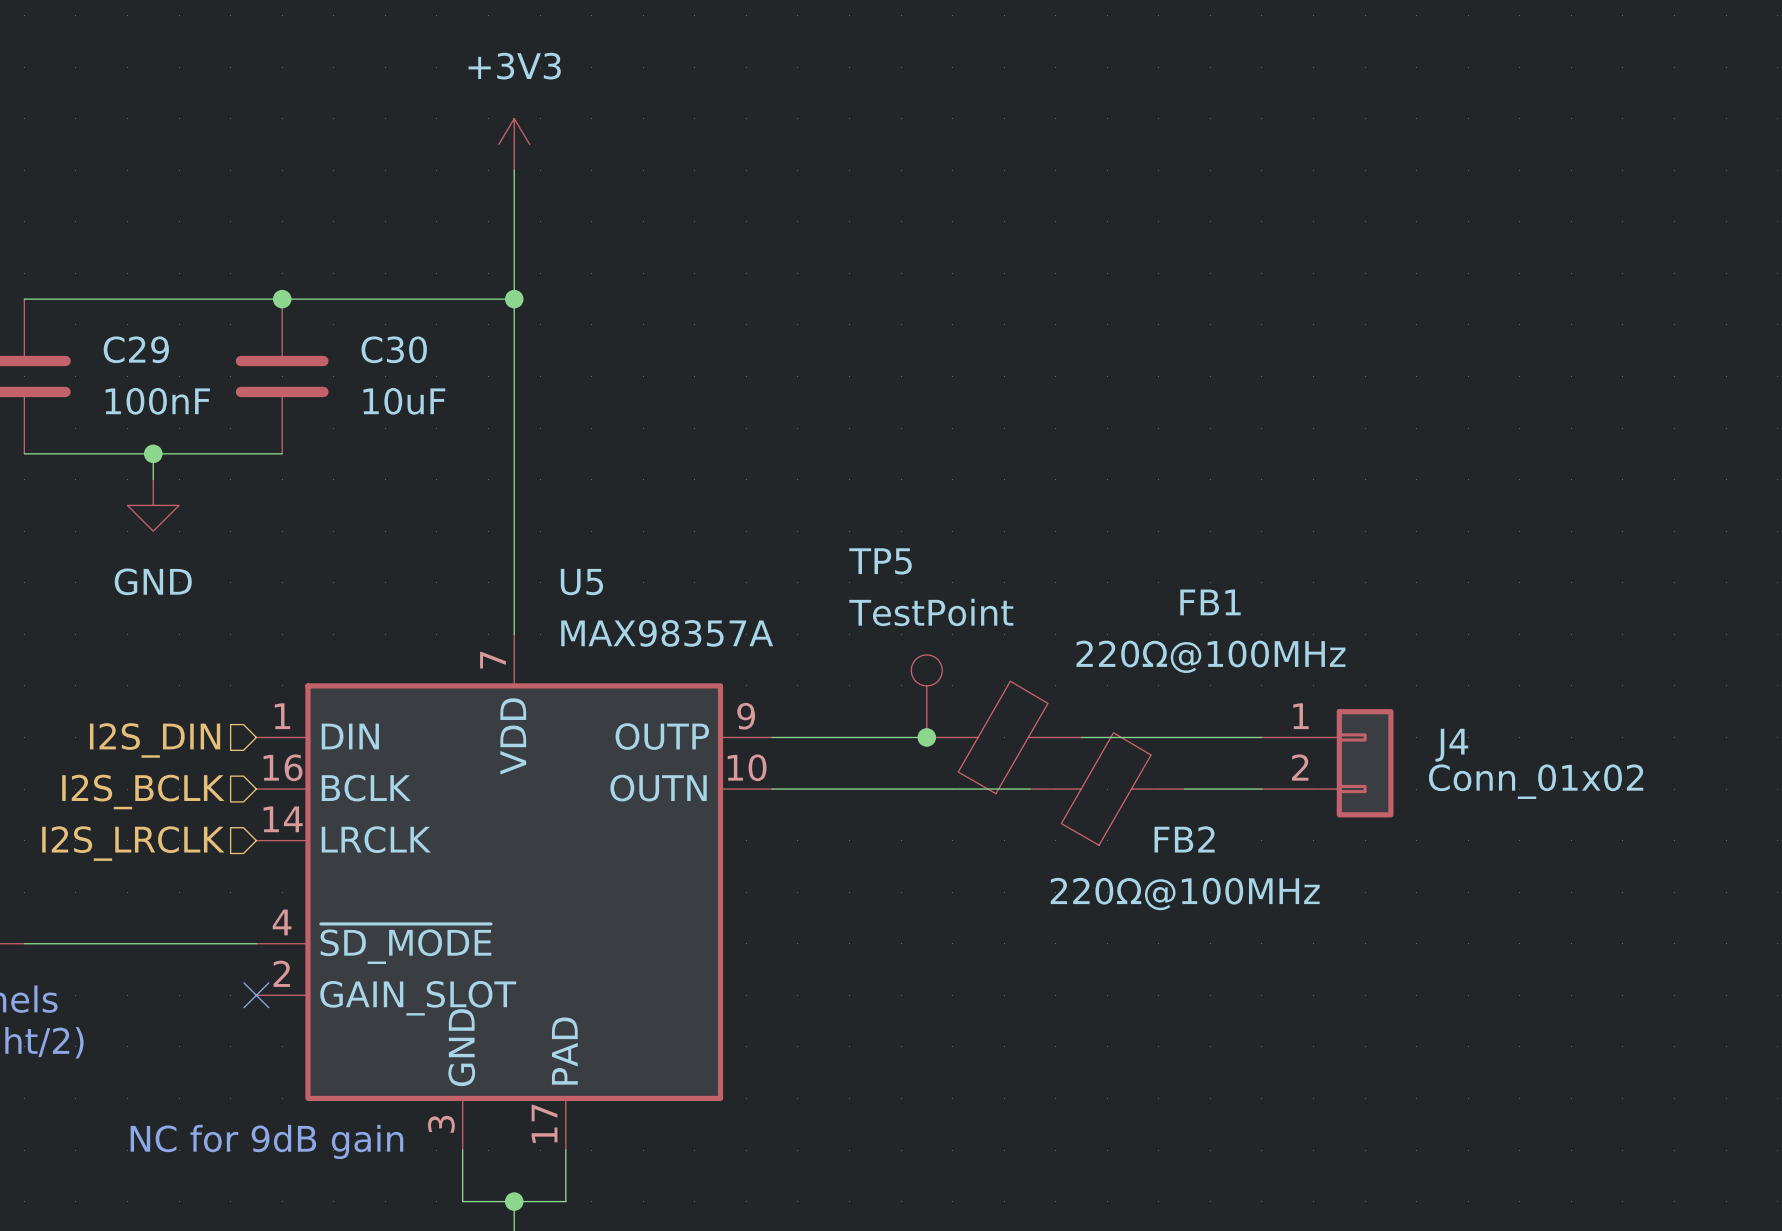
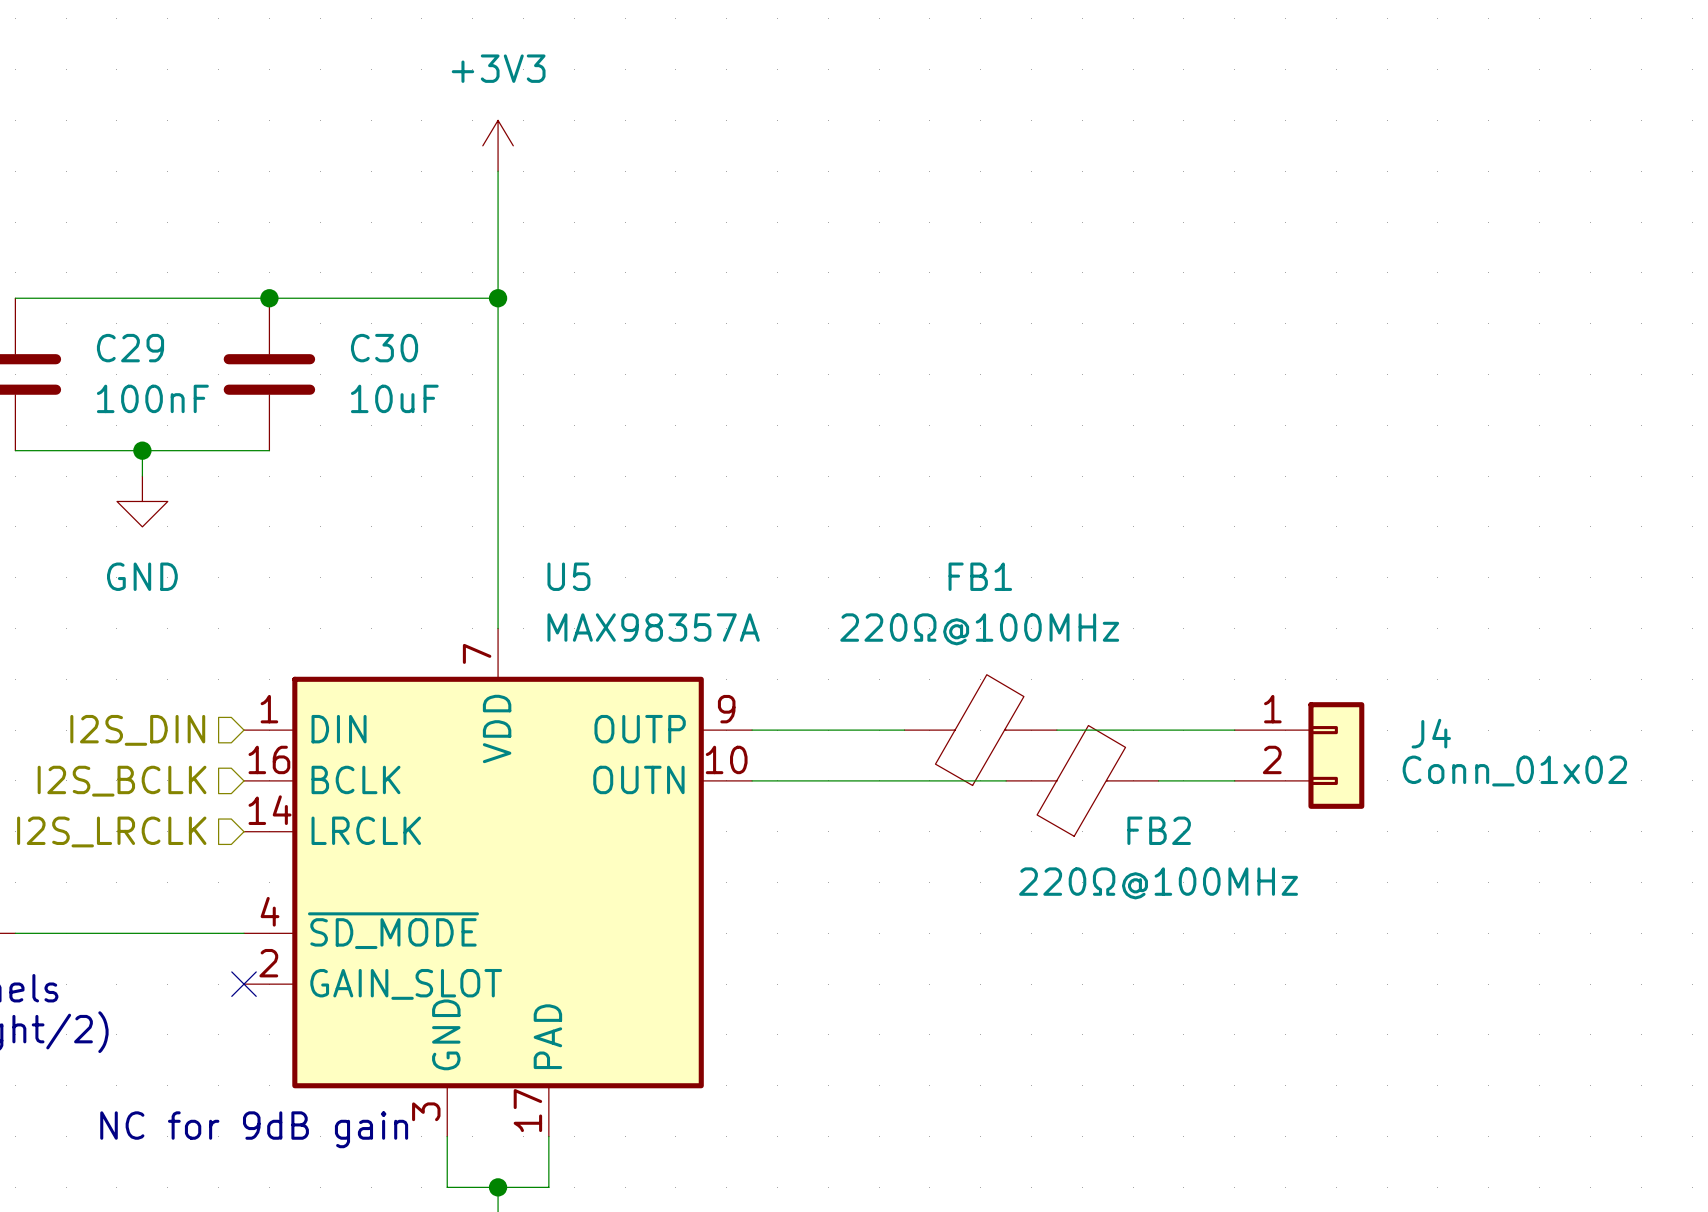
FB1 name position: FB1 (1210, 602) -> FB1 (980, 576)
FB1 value position: 220Ω@100MHz (1210, 656) -> 220Ω@100MHz (979, 629)
TP5: TestPoint (926, 696) -> none
junction: (926, 737) -> none

